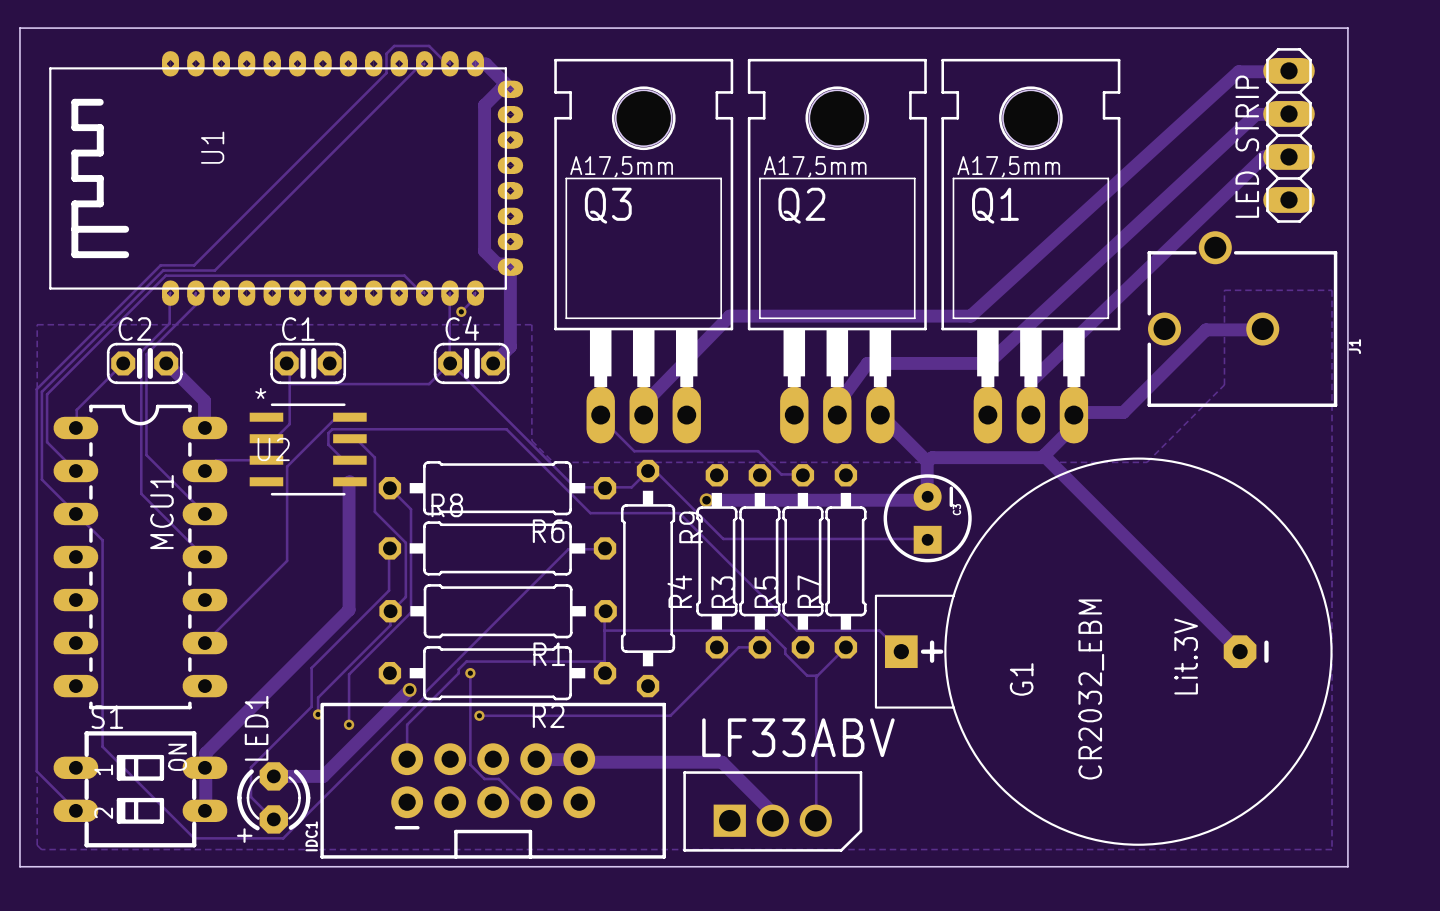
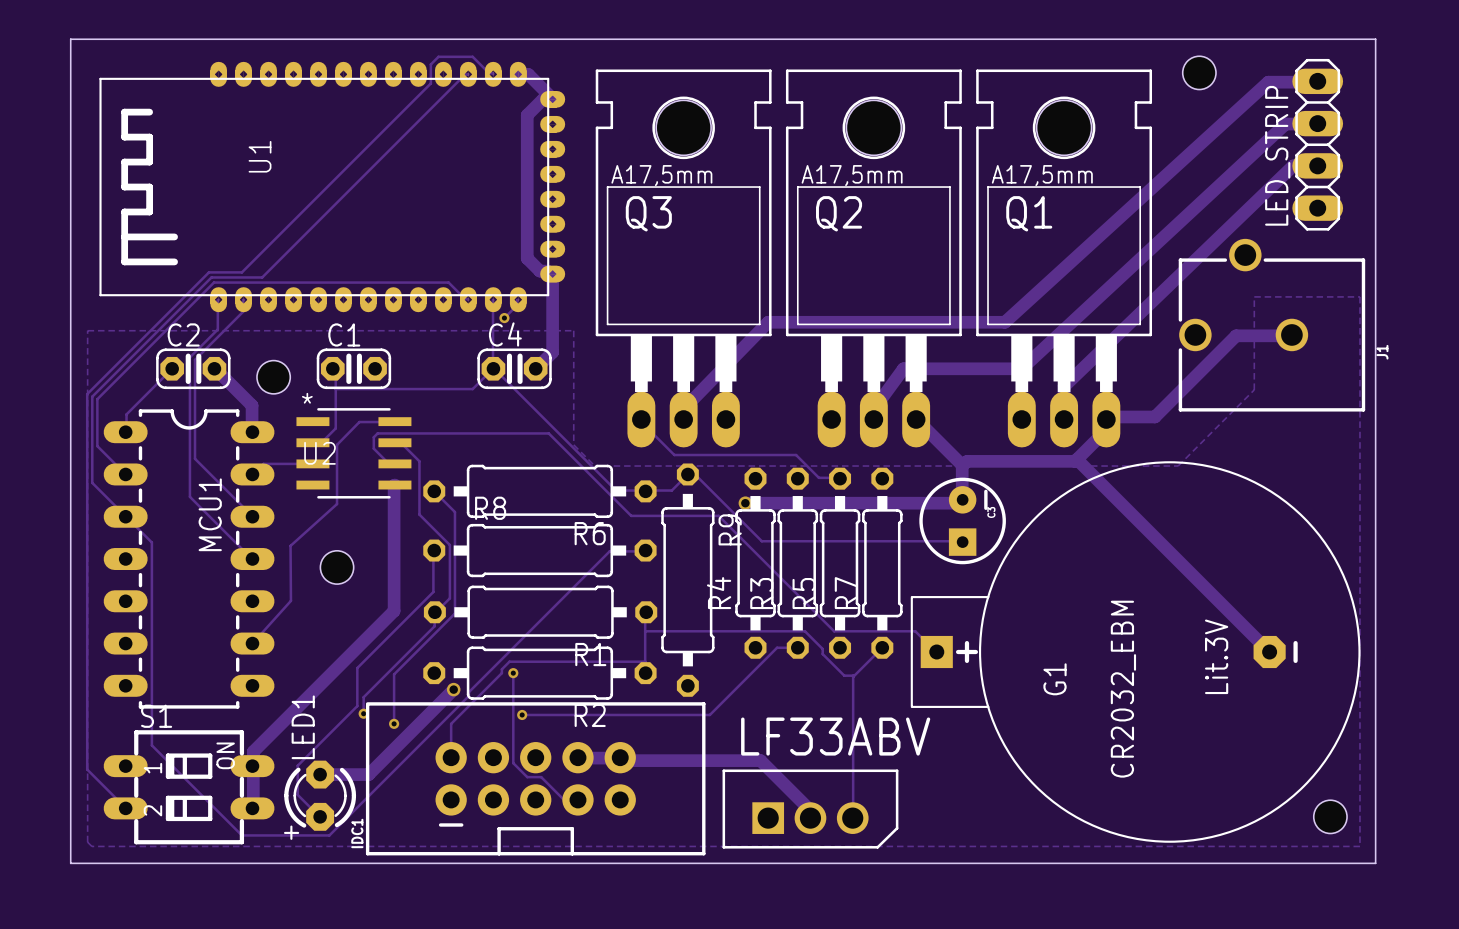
hole: none -> (1199, 72)
hole: none -> (273, 377)
track: (336, 417) (287, 466) (287, 560) (204, 643) -> (381, 422) (359, 422) (337, 444) (337, 504) (290, 545) (290, 600) (252, 643)
hole: none -> (337, 567)
hole: none -> (1330, 816)

